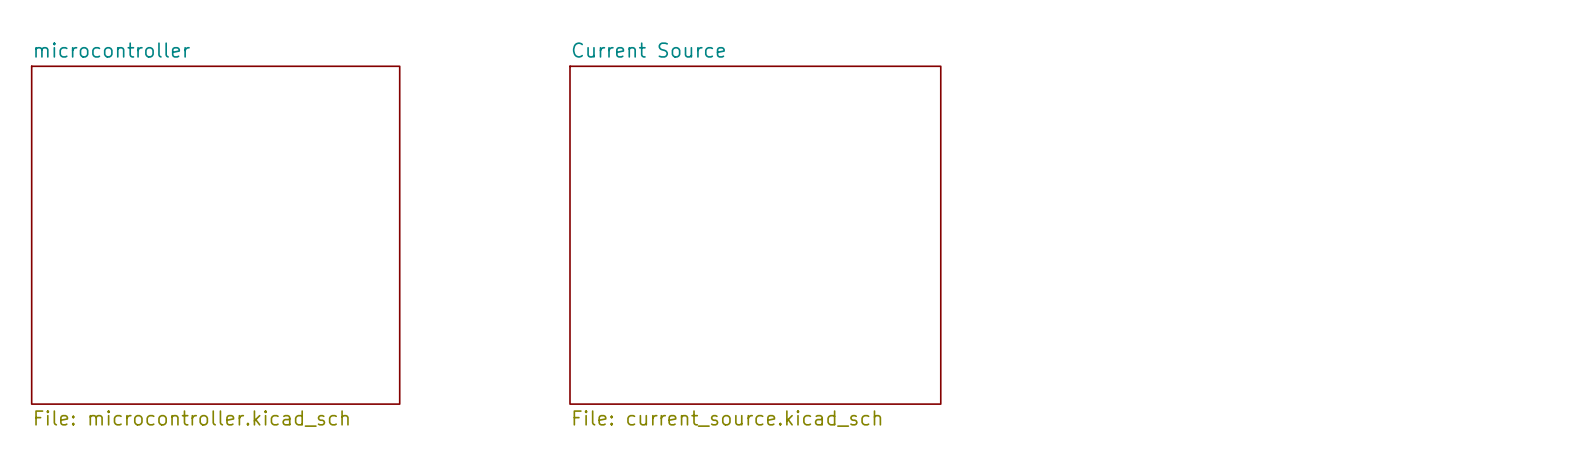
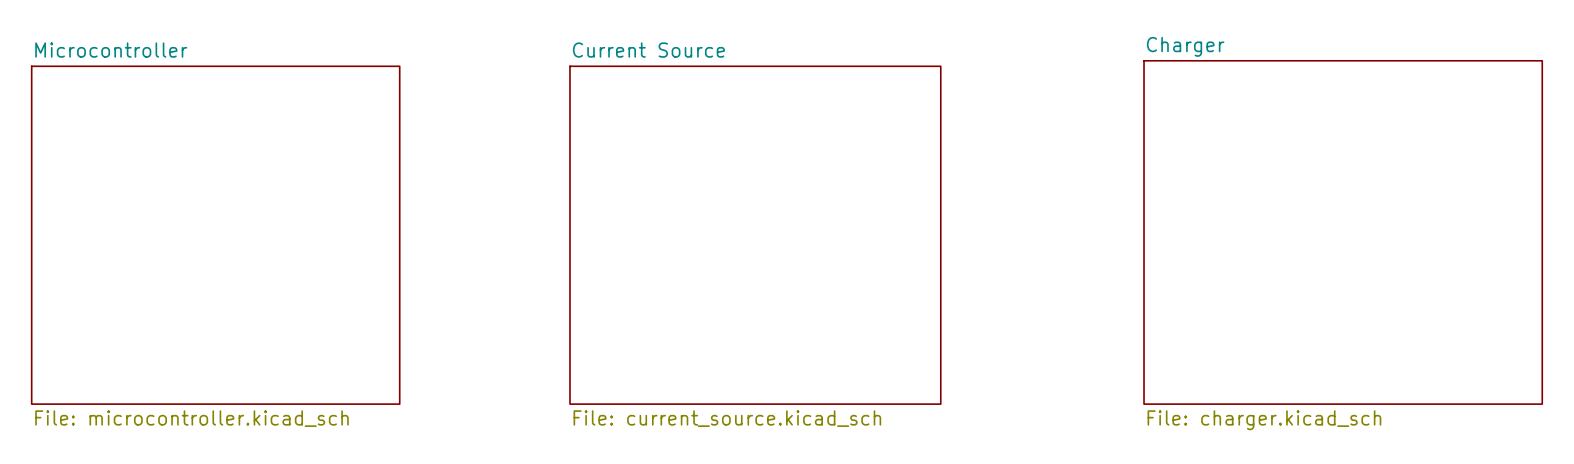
sheet microcontroller name: microcontroller (112, 50) -> Microcontroller (111, 50)
sheet Charger: none -> File: charger.kicad_sch (1343, 232)

